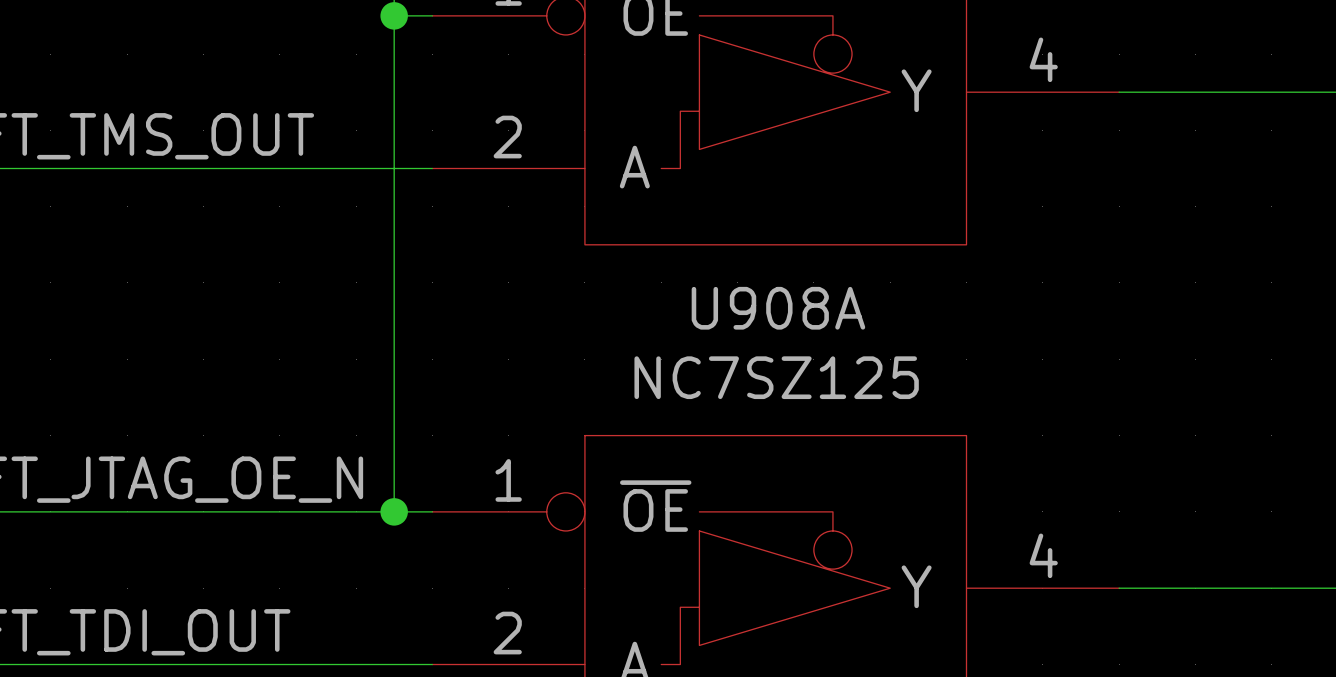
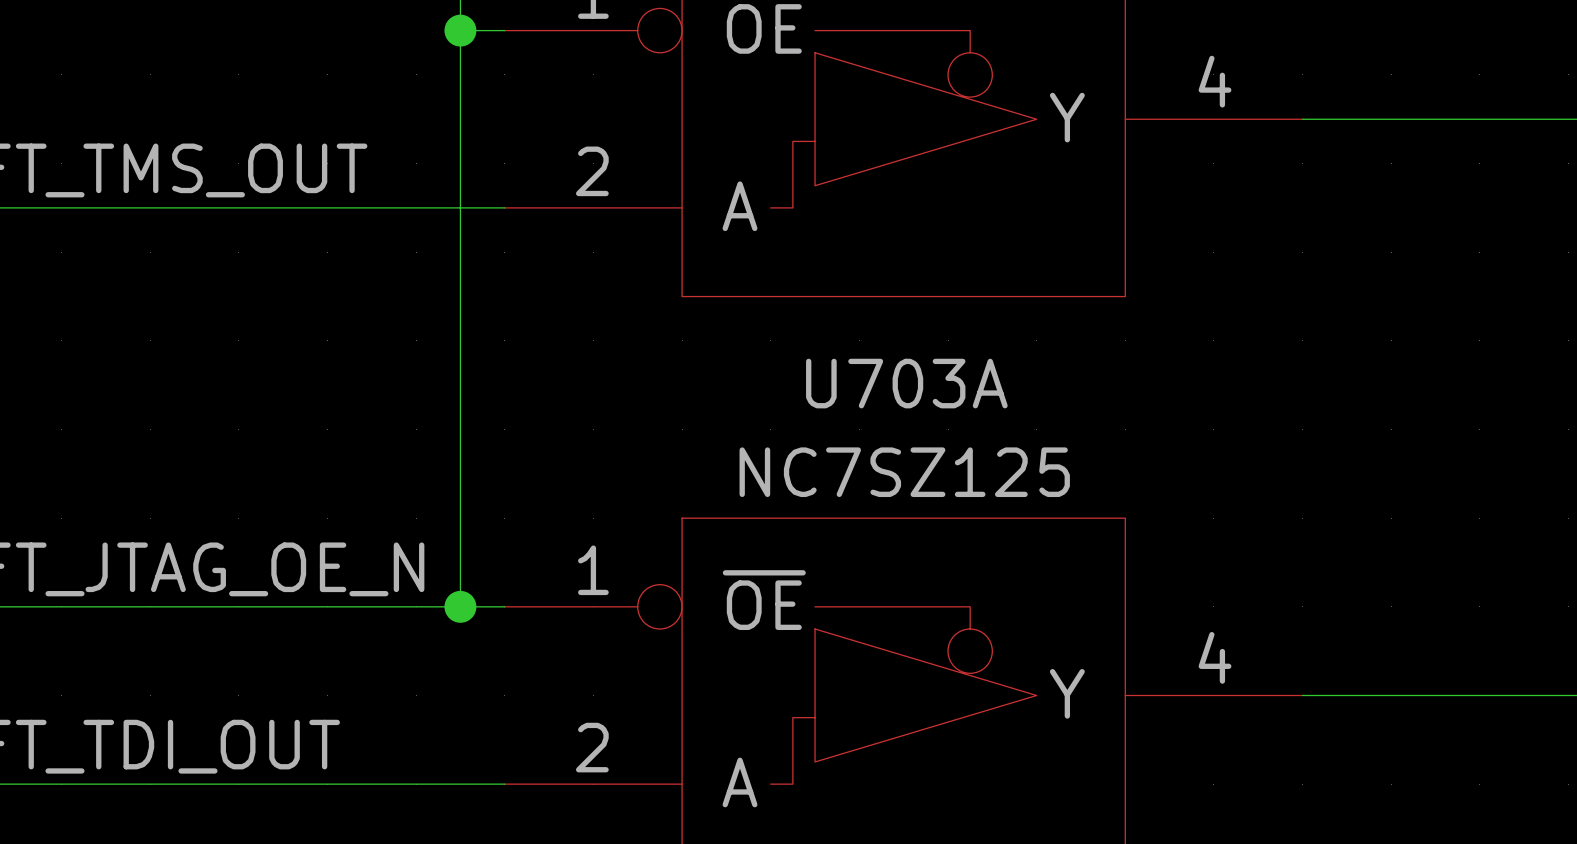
U908A name: U908A (778, 308) -> U703A (906, 383)
U908A value position: NC7SZ125 (776, 377) -> NC7SZ125 (904, 472)

